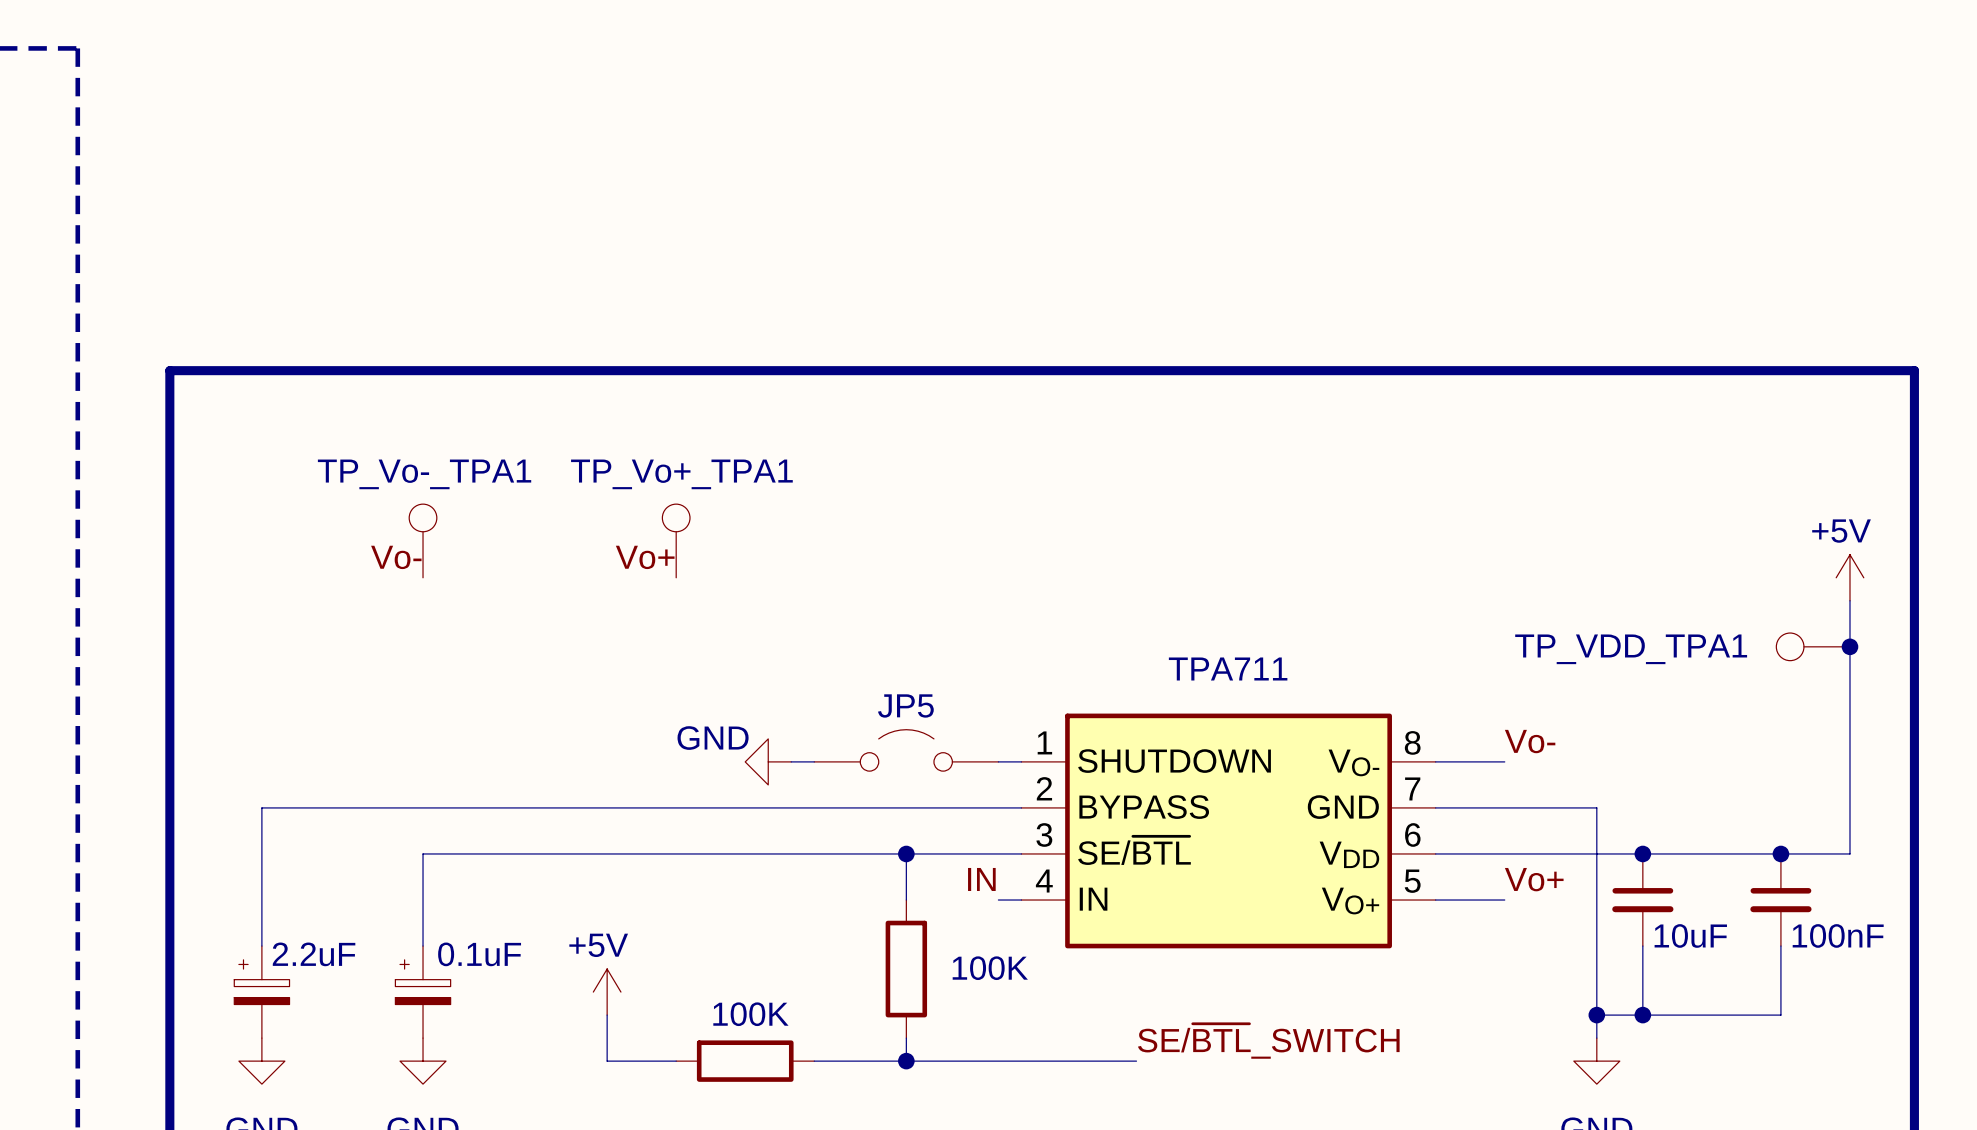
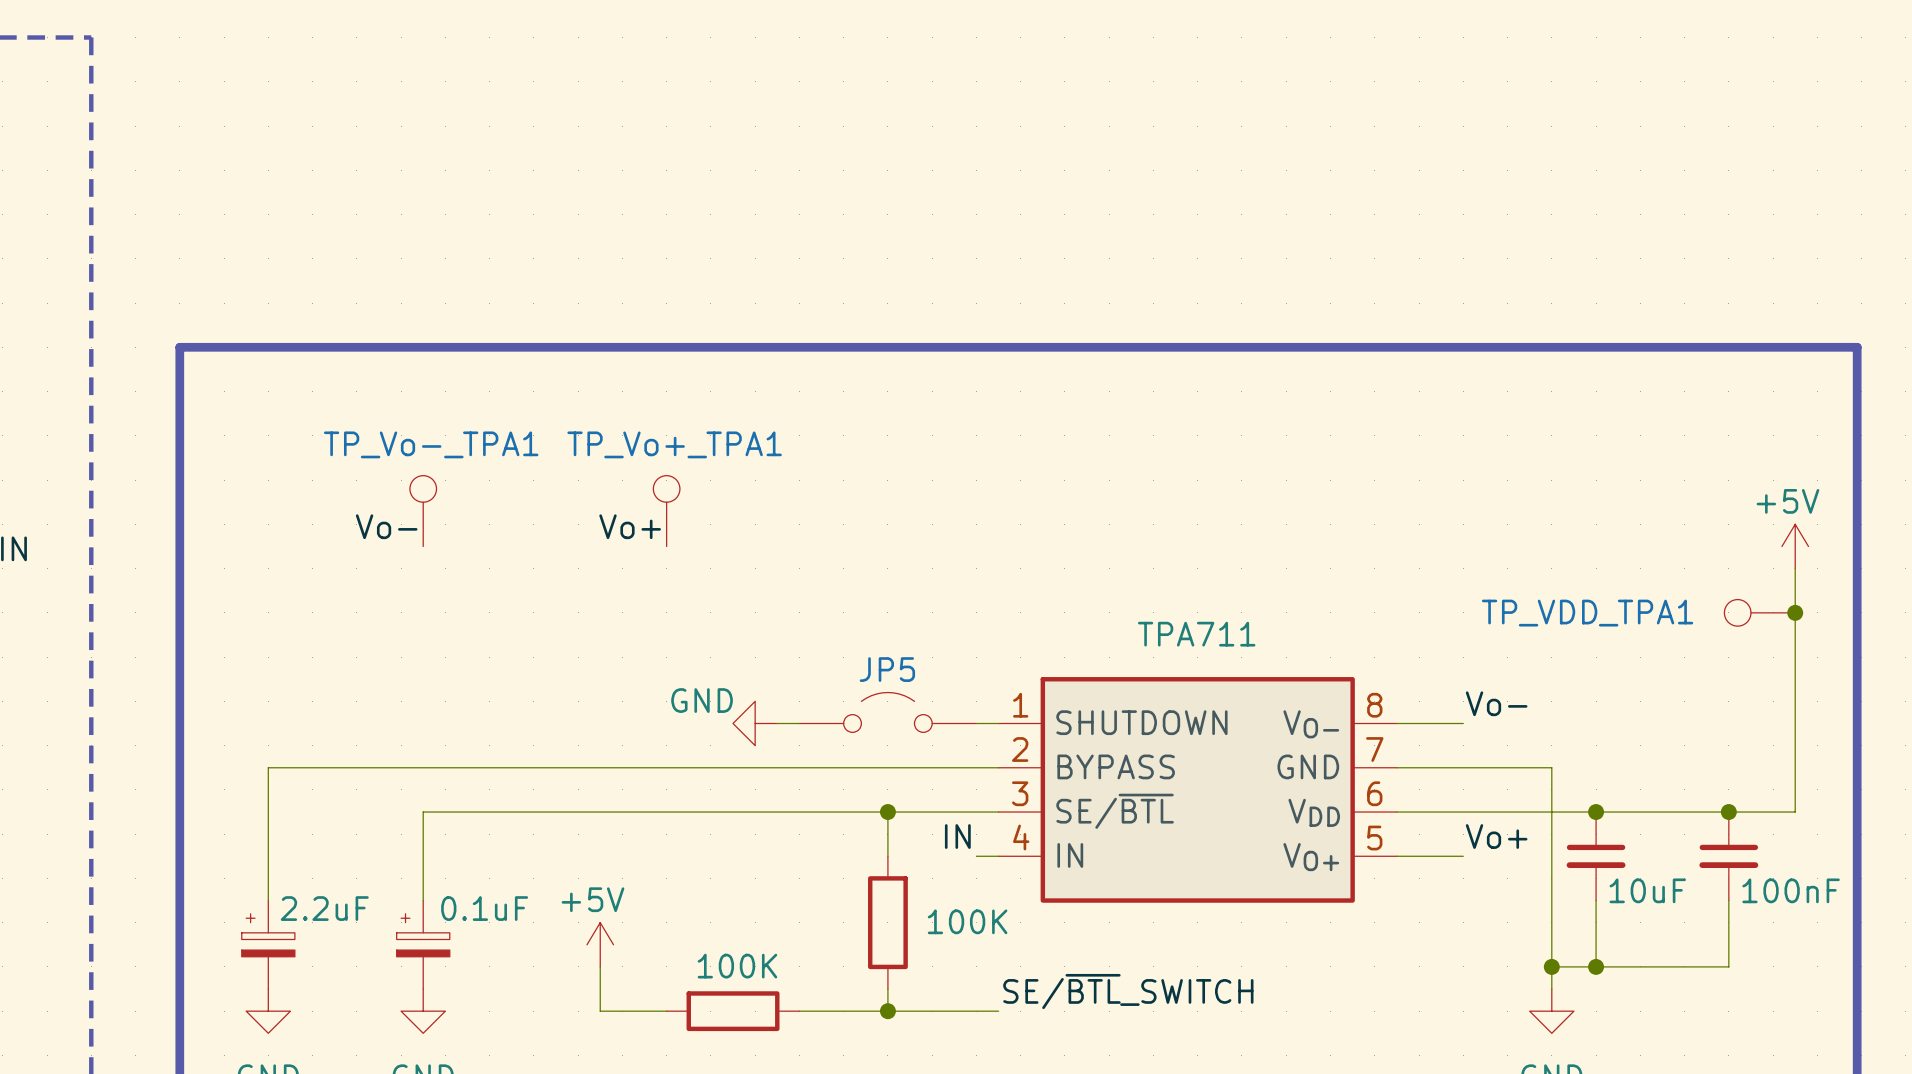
label position: SE/~{BTL}_SWITCH (1268, 1041) -> SE/~{BTL}_SWITCH (1128, 991)
wire: (1021, 1061) (1136, 1061) -> none

